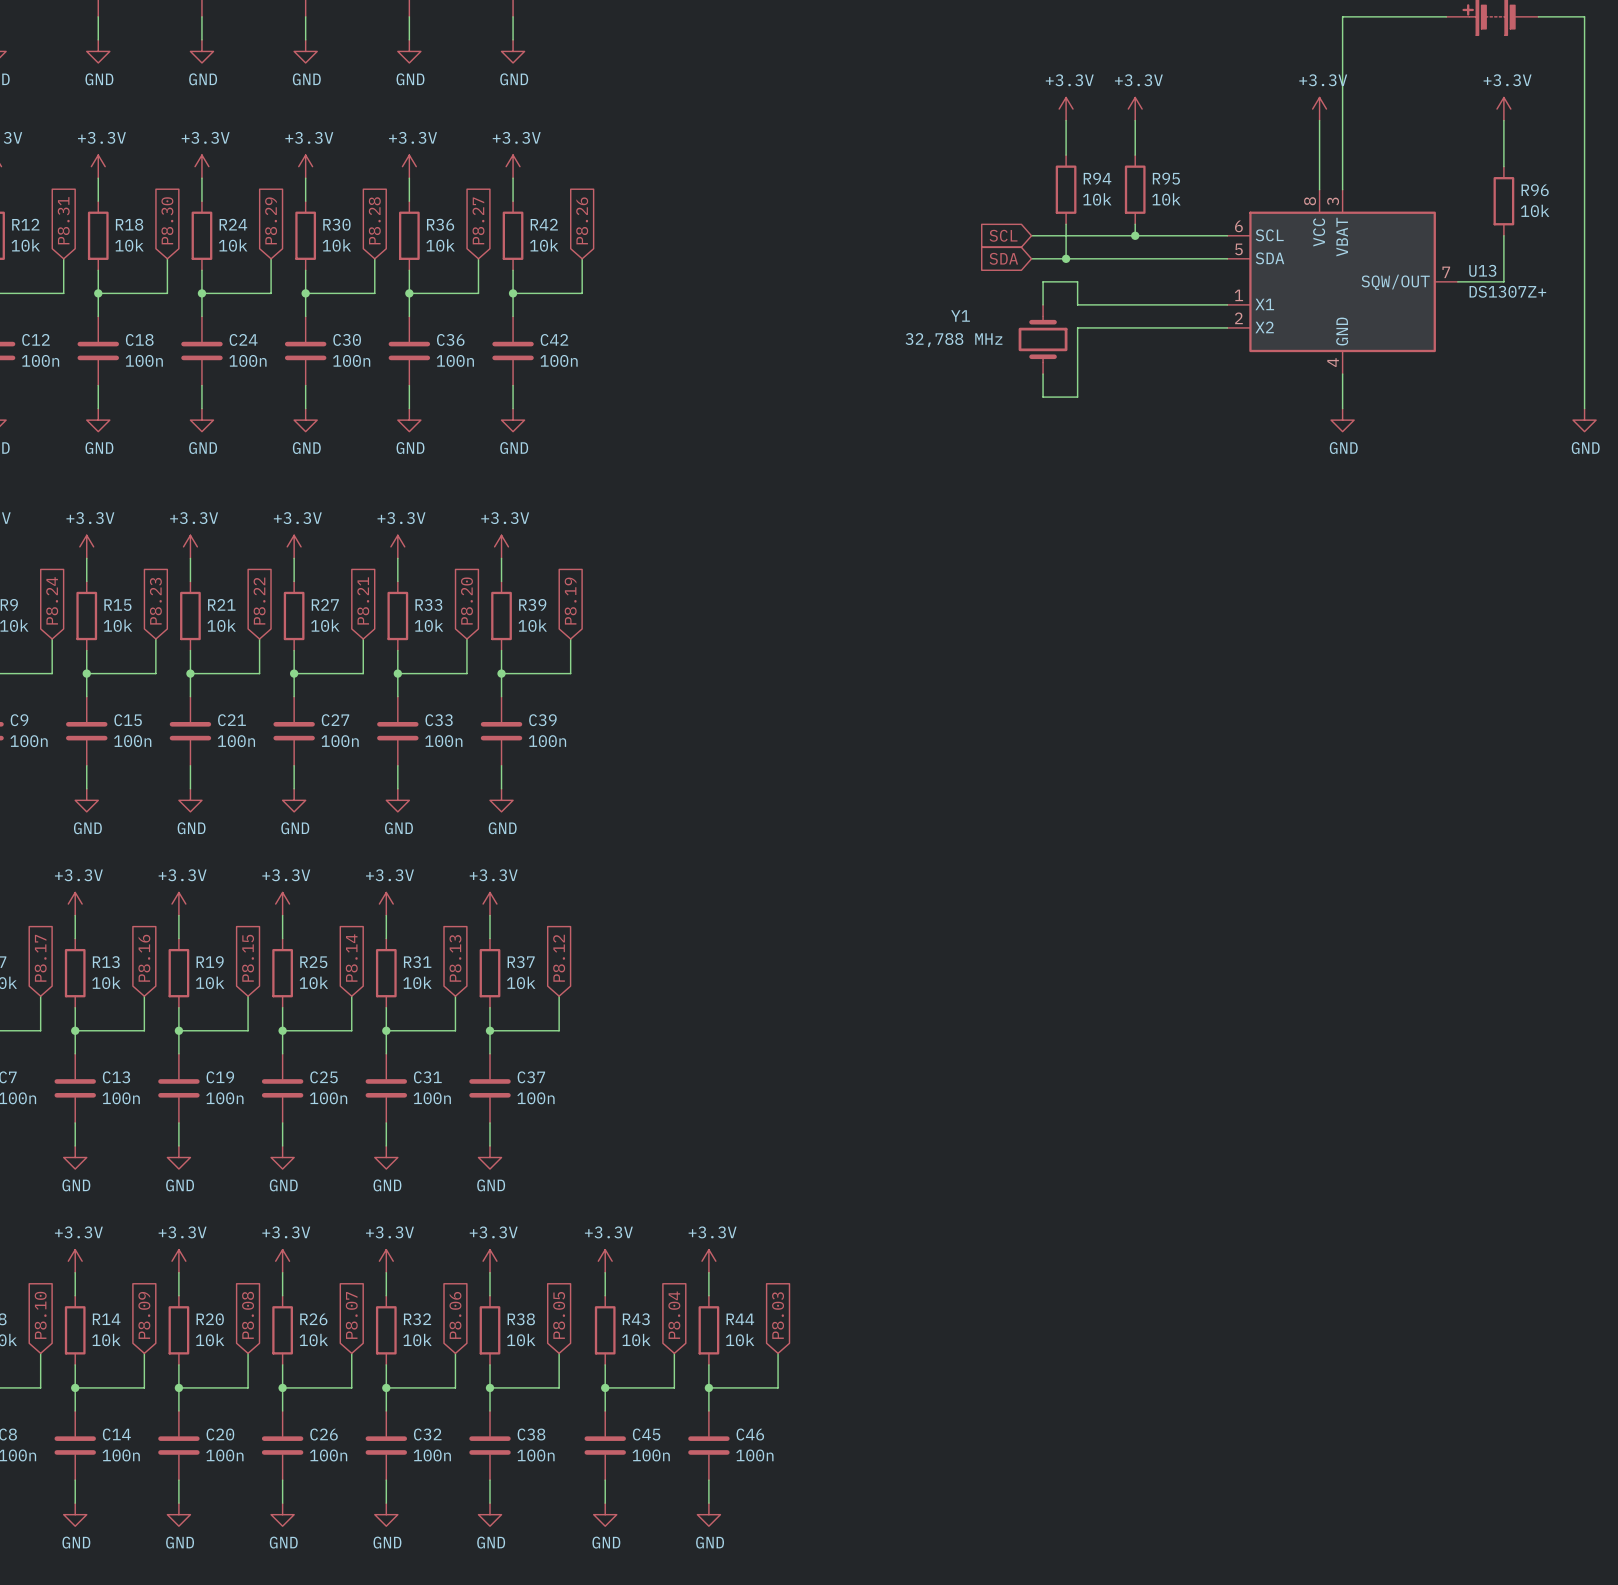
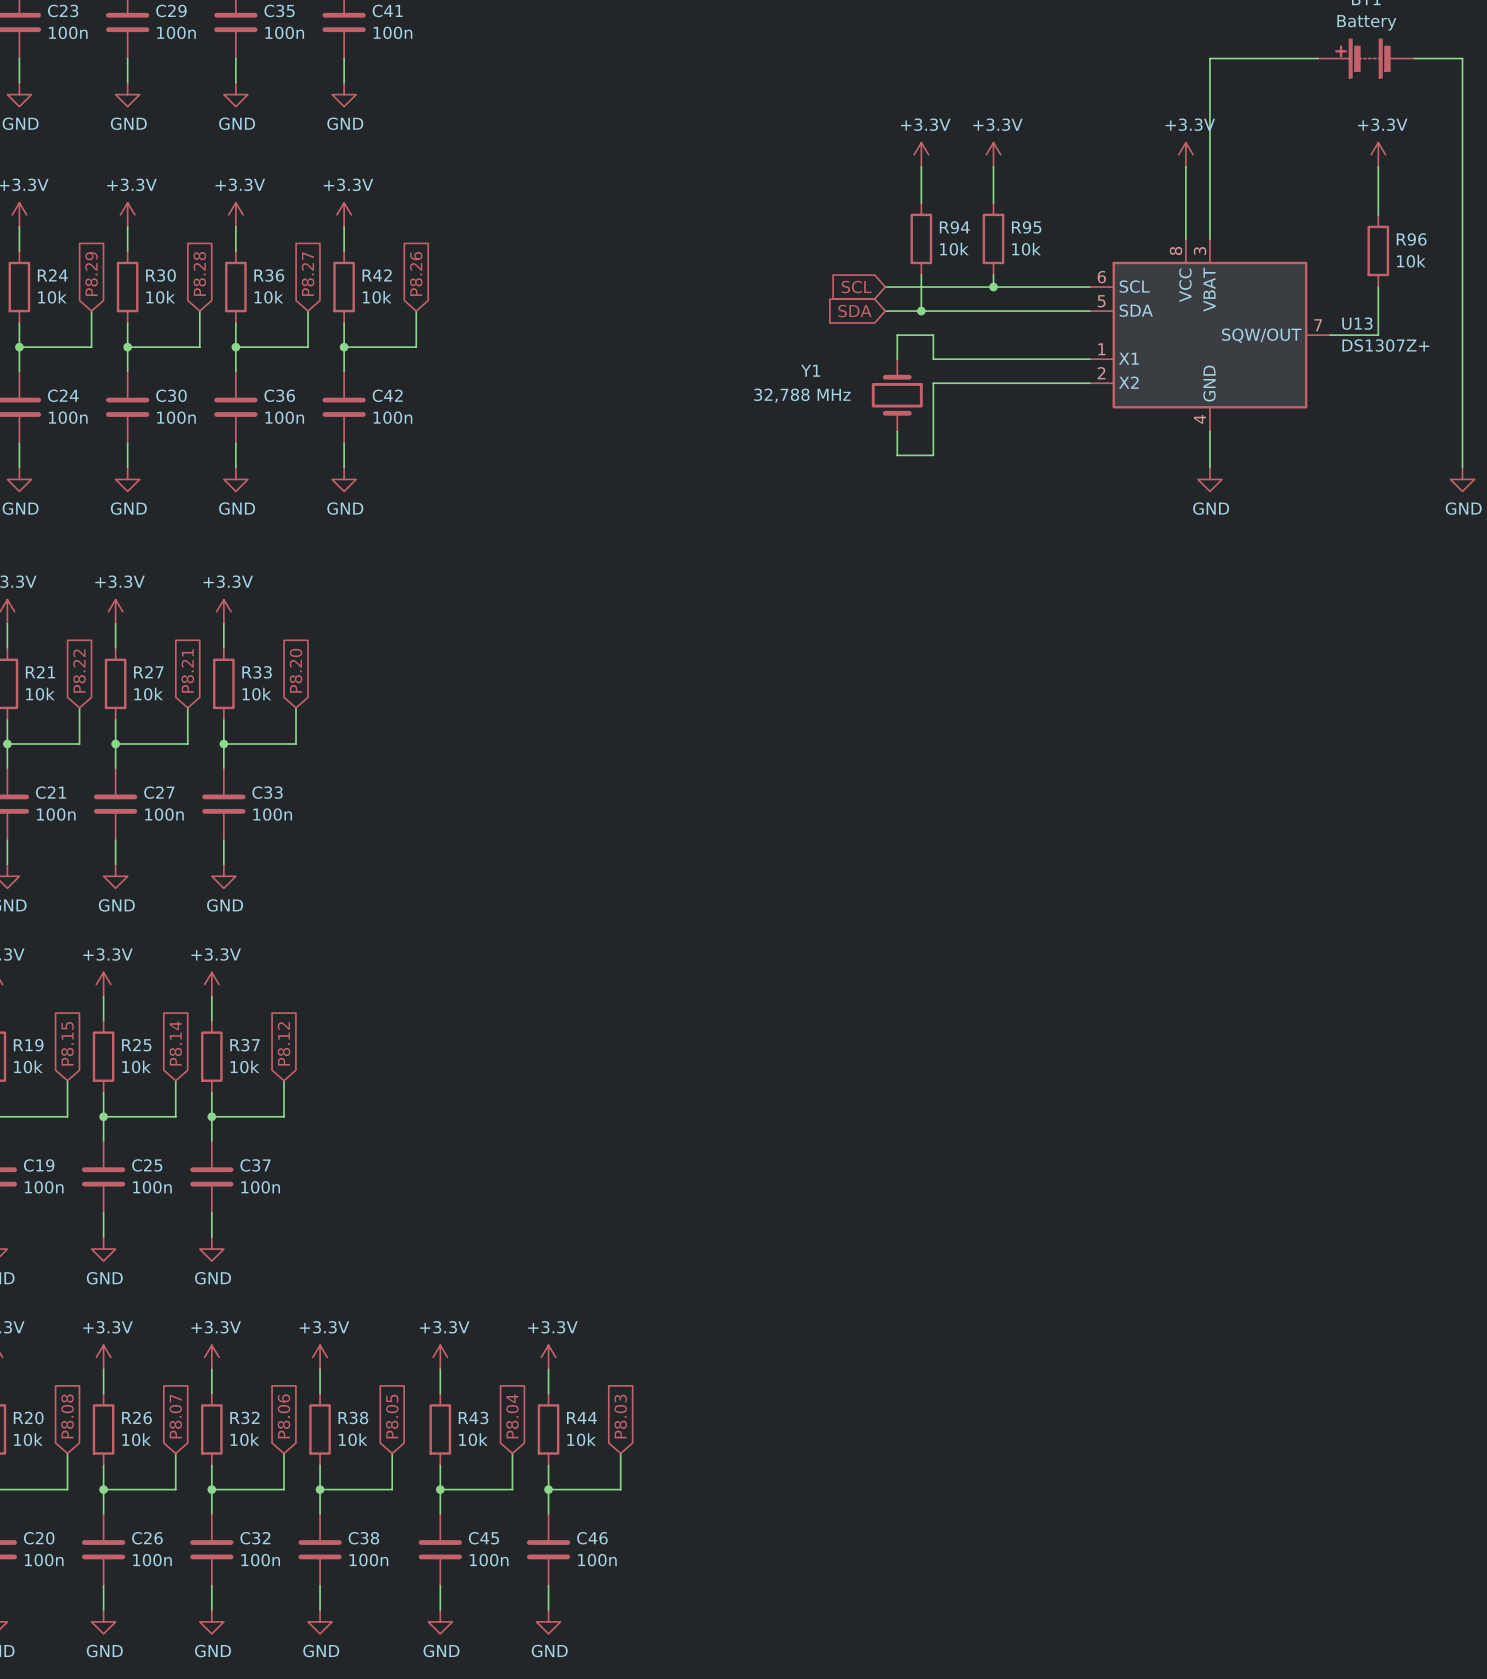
power symbol: +3.3V (501, 546) -> none
wire: (501, 558) (501, 581) -> none
global label: P8.19 (570, 601) -> none
R39: 10k (501, 615) -> none
wire: (570, 639) (570, 673) (501, 673) -> none
wire: (501, 650) (501, 696) -> none
junction: (501, 673) -> none
C39: 100n (501, 731) -> none
wire: (501, 765) (501, 788) -> none
power symbol: GND (501, 800) -> none
power symbol: +3.3V (490, 904) -> none
wire: (490, 915) (490, 938) -> none
global label: P8.13 (455, 958) -> P8.12 (283, 1043)
global label: P8.12 (559, 958) -> none
R31 name: R31 (417, 962) -> R37 (244, 1045)
R37: 10k (490, 973) -> none
wire: (559, 996) (559, 1030) (490, 1030) -> none
wire: (490, 1007) (490, 1053) -> none
junction: (490, 1030) -> none
C31 name: C31 (427, 1077) -> C37 (255, 1165)
C37: 100n (490, 1088) -> none
wire: (490, 1122) (490, 1145) -> none
power symbol: GND (490, 1157) -> none

